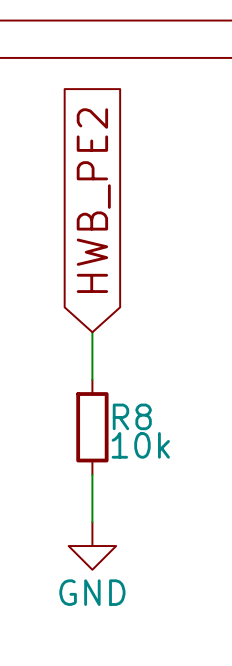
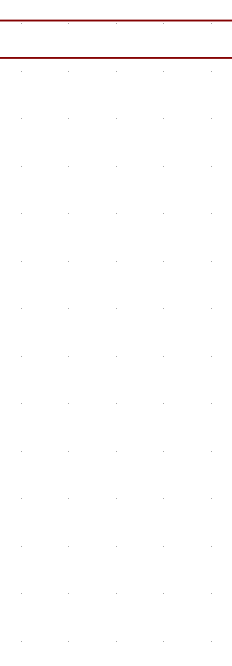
global label: HWB_PE2 (93, 200) -> none
wire: (92, 332) (92, 379) -> none
R8: 10k (92, 427) -> none
wire: (92, 474) (92, 522) -> none
power symbol: GND (92, 546) -> none

